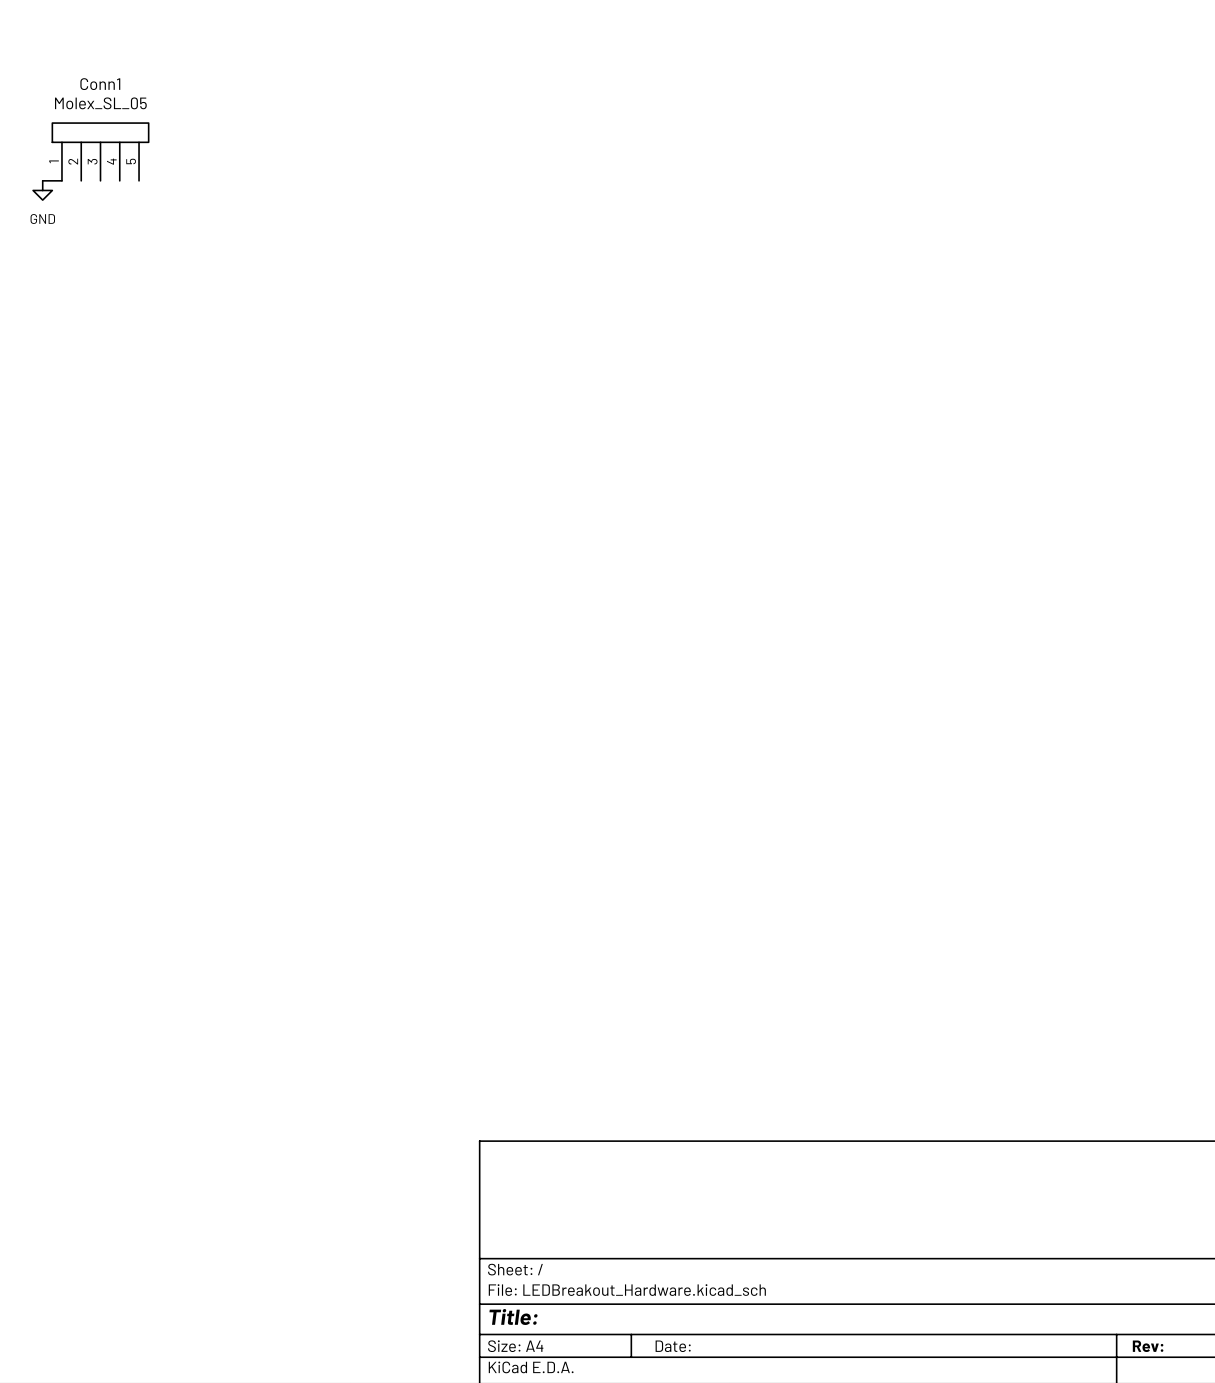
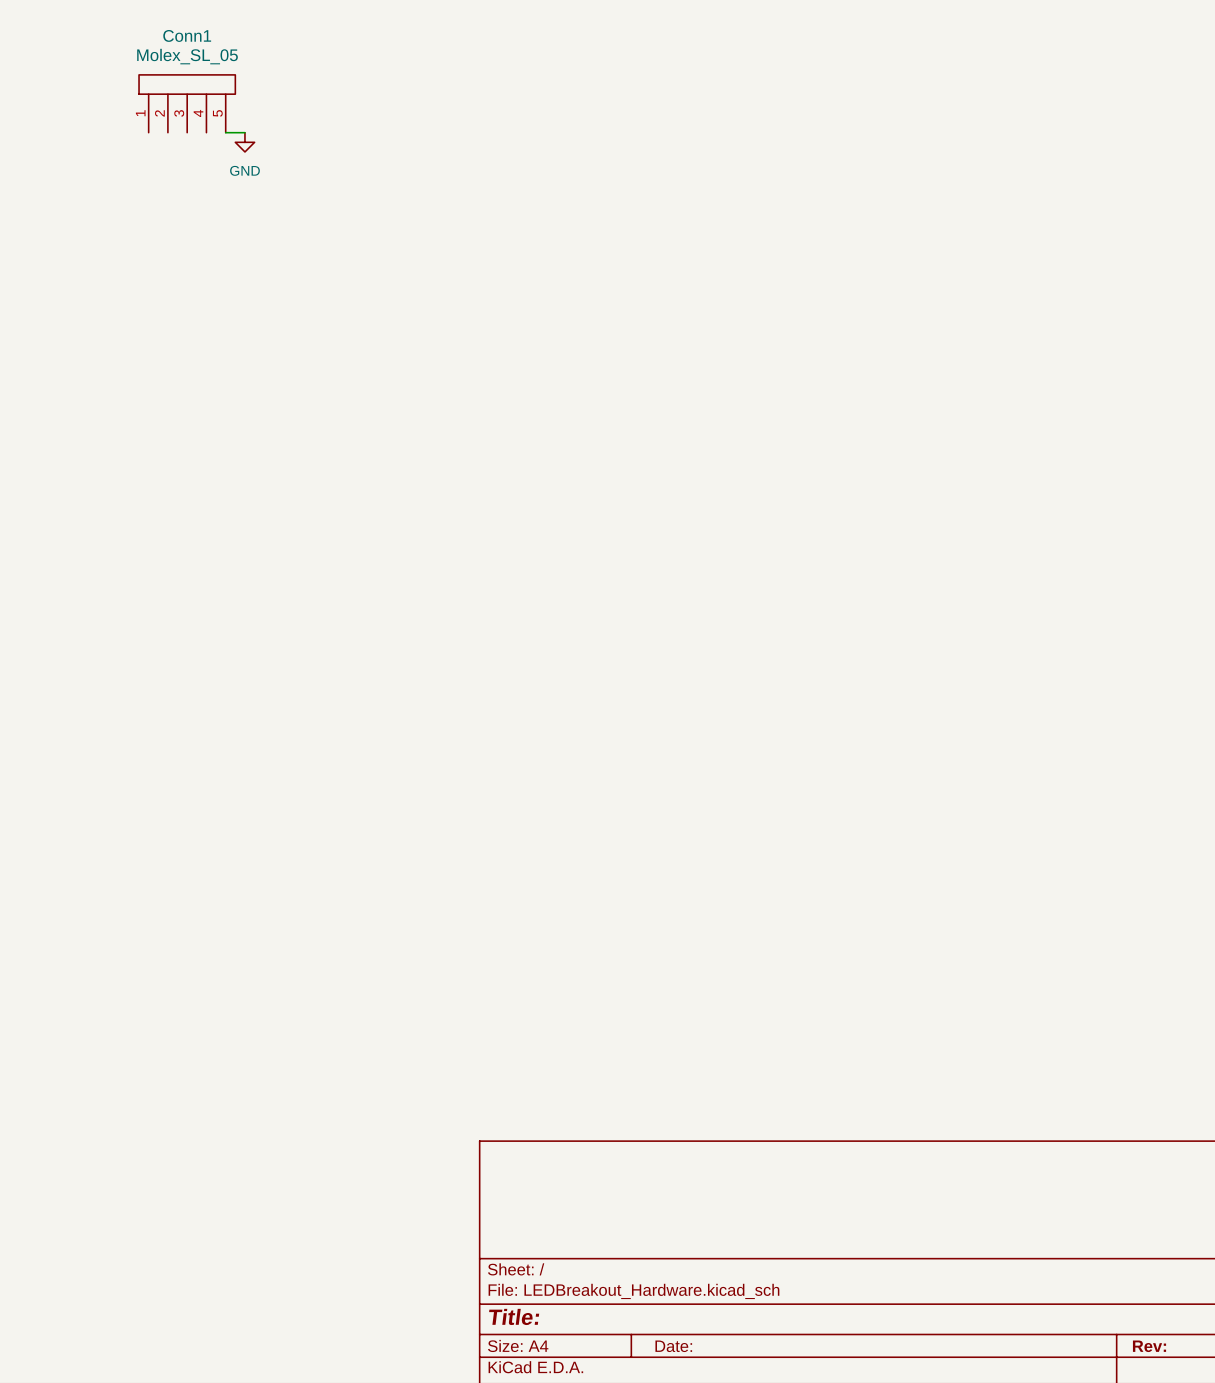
power symbol: none -> GND (244, 142)
Conn1 position: (100, 151) -> (187, 103)
wire: (42, 180) (61, 180) -> (225, 132) (244, 132)
power symbol: GND (42, 190) -> none

